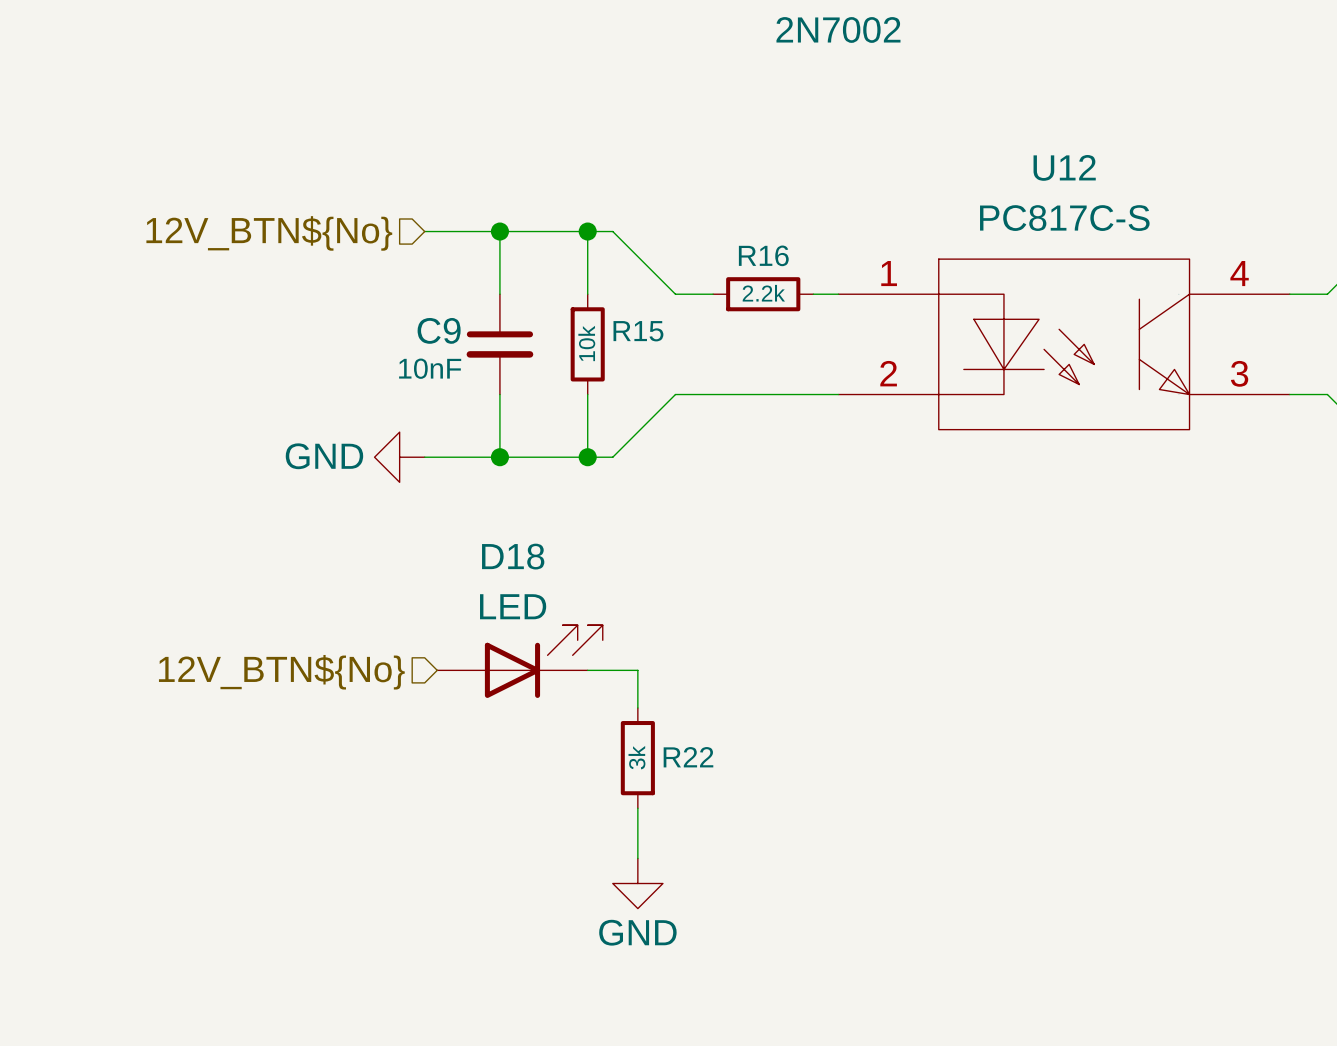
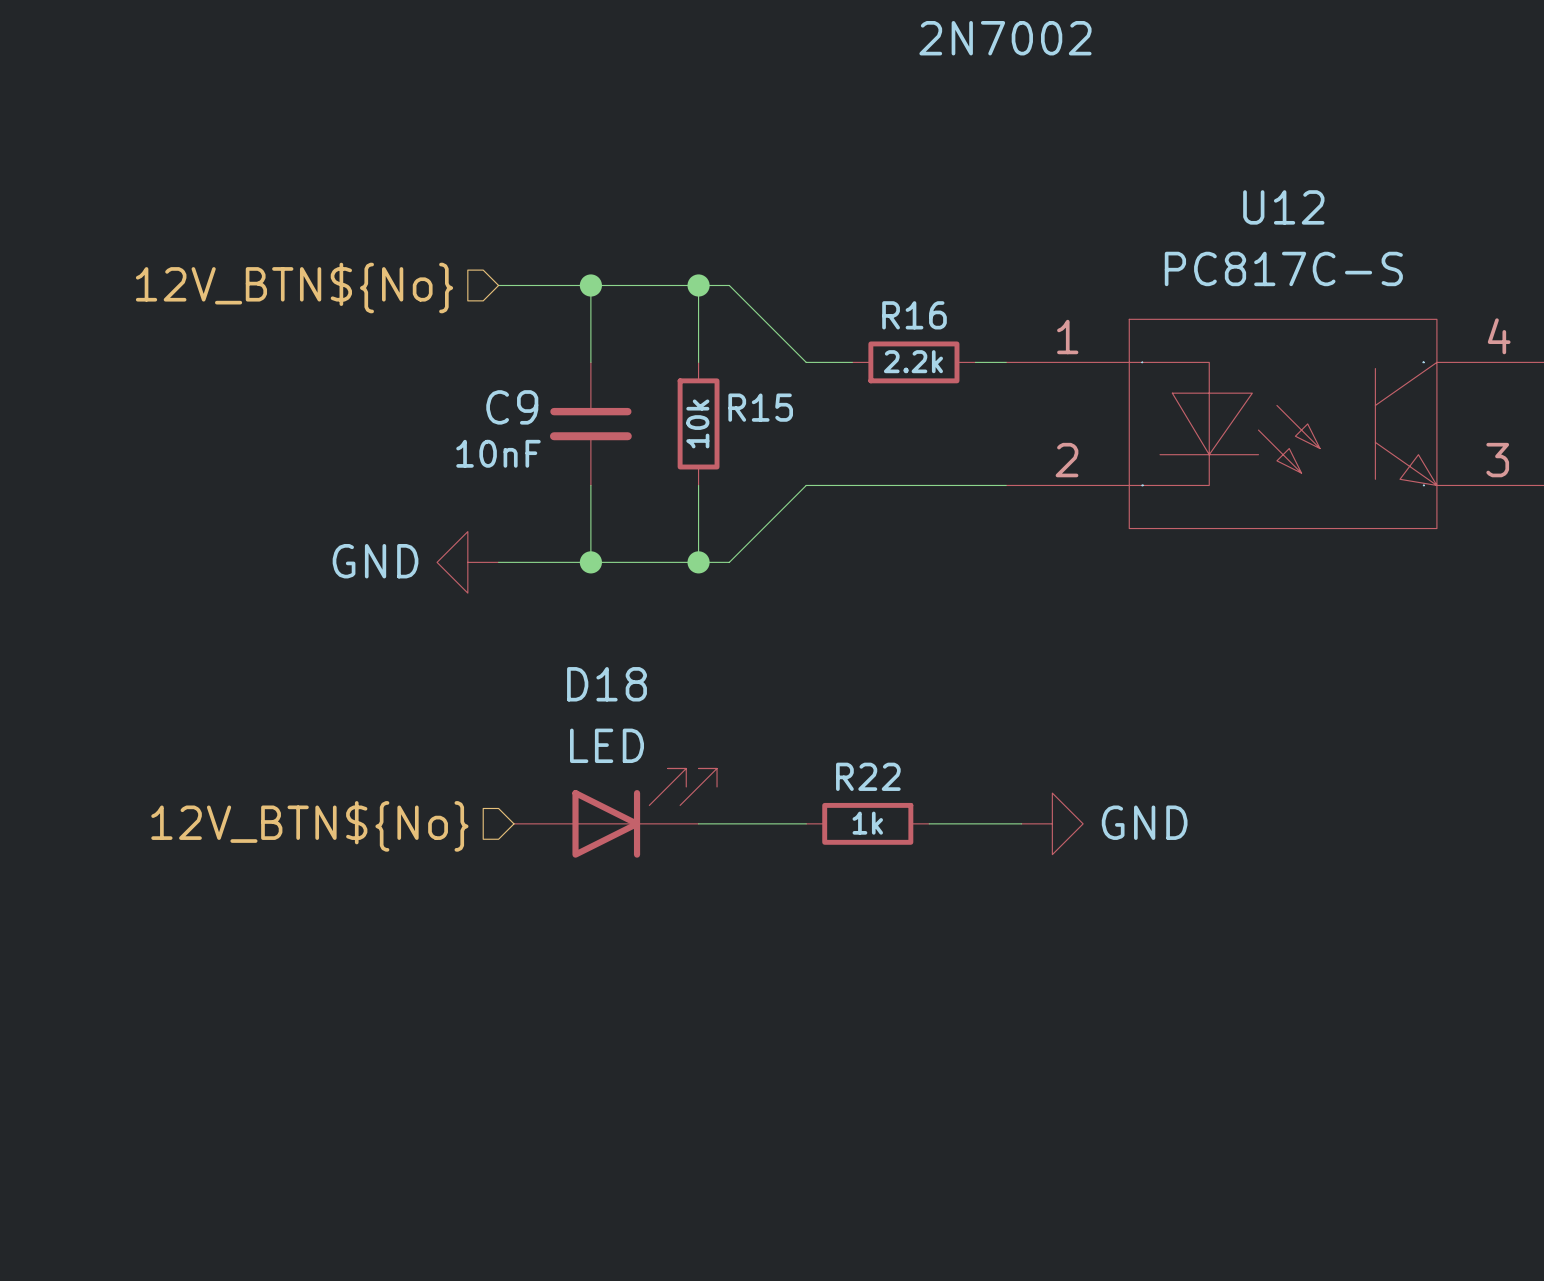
wire: (637, 670) (637, 707) -> (760, 823) (806, 823)
wire: none -> (929, 823) (1021, 823)
R22 value: 3k (636, 757) -> 1k (867, 823)
R22 name position: R22 (688, 757) -> R22 (868, 776)
R22 rotation: 0° (637, 758) -> 90° clockwise (867, 823)
R22 position: (637, 758) -> (867, 823)
wire: (637, 808) (637, 858) -> none
power symbol rotation: 0° (637, 883) -> 90° counterclockwise (1052, 823)
power symbol position: GND (637, 883) -> GND (1052, 823)

